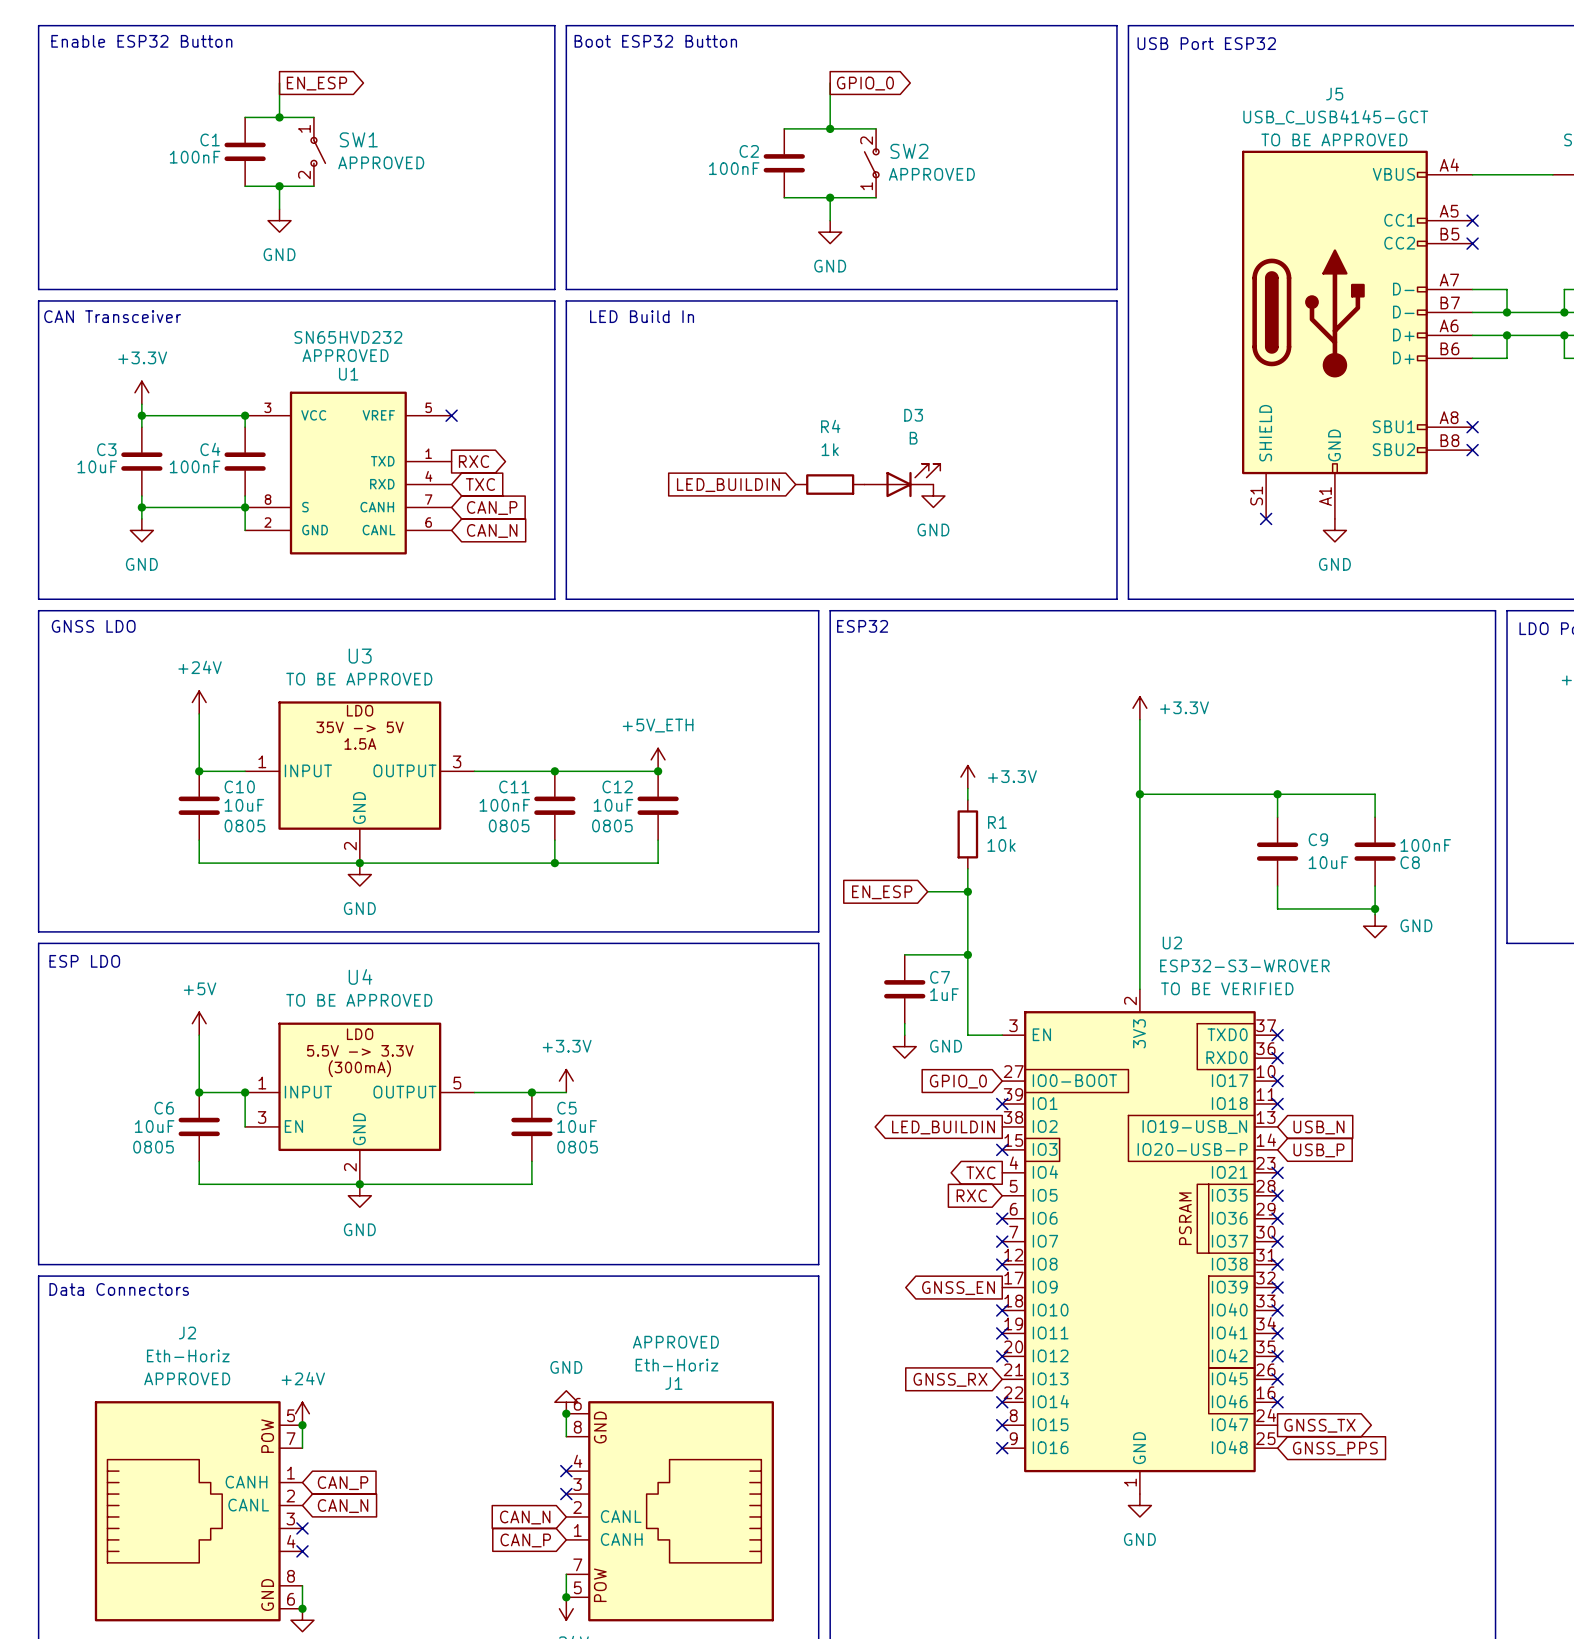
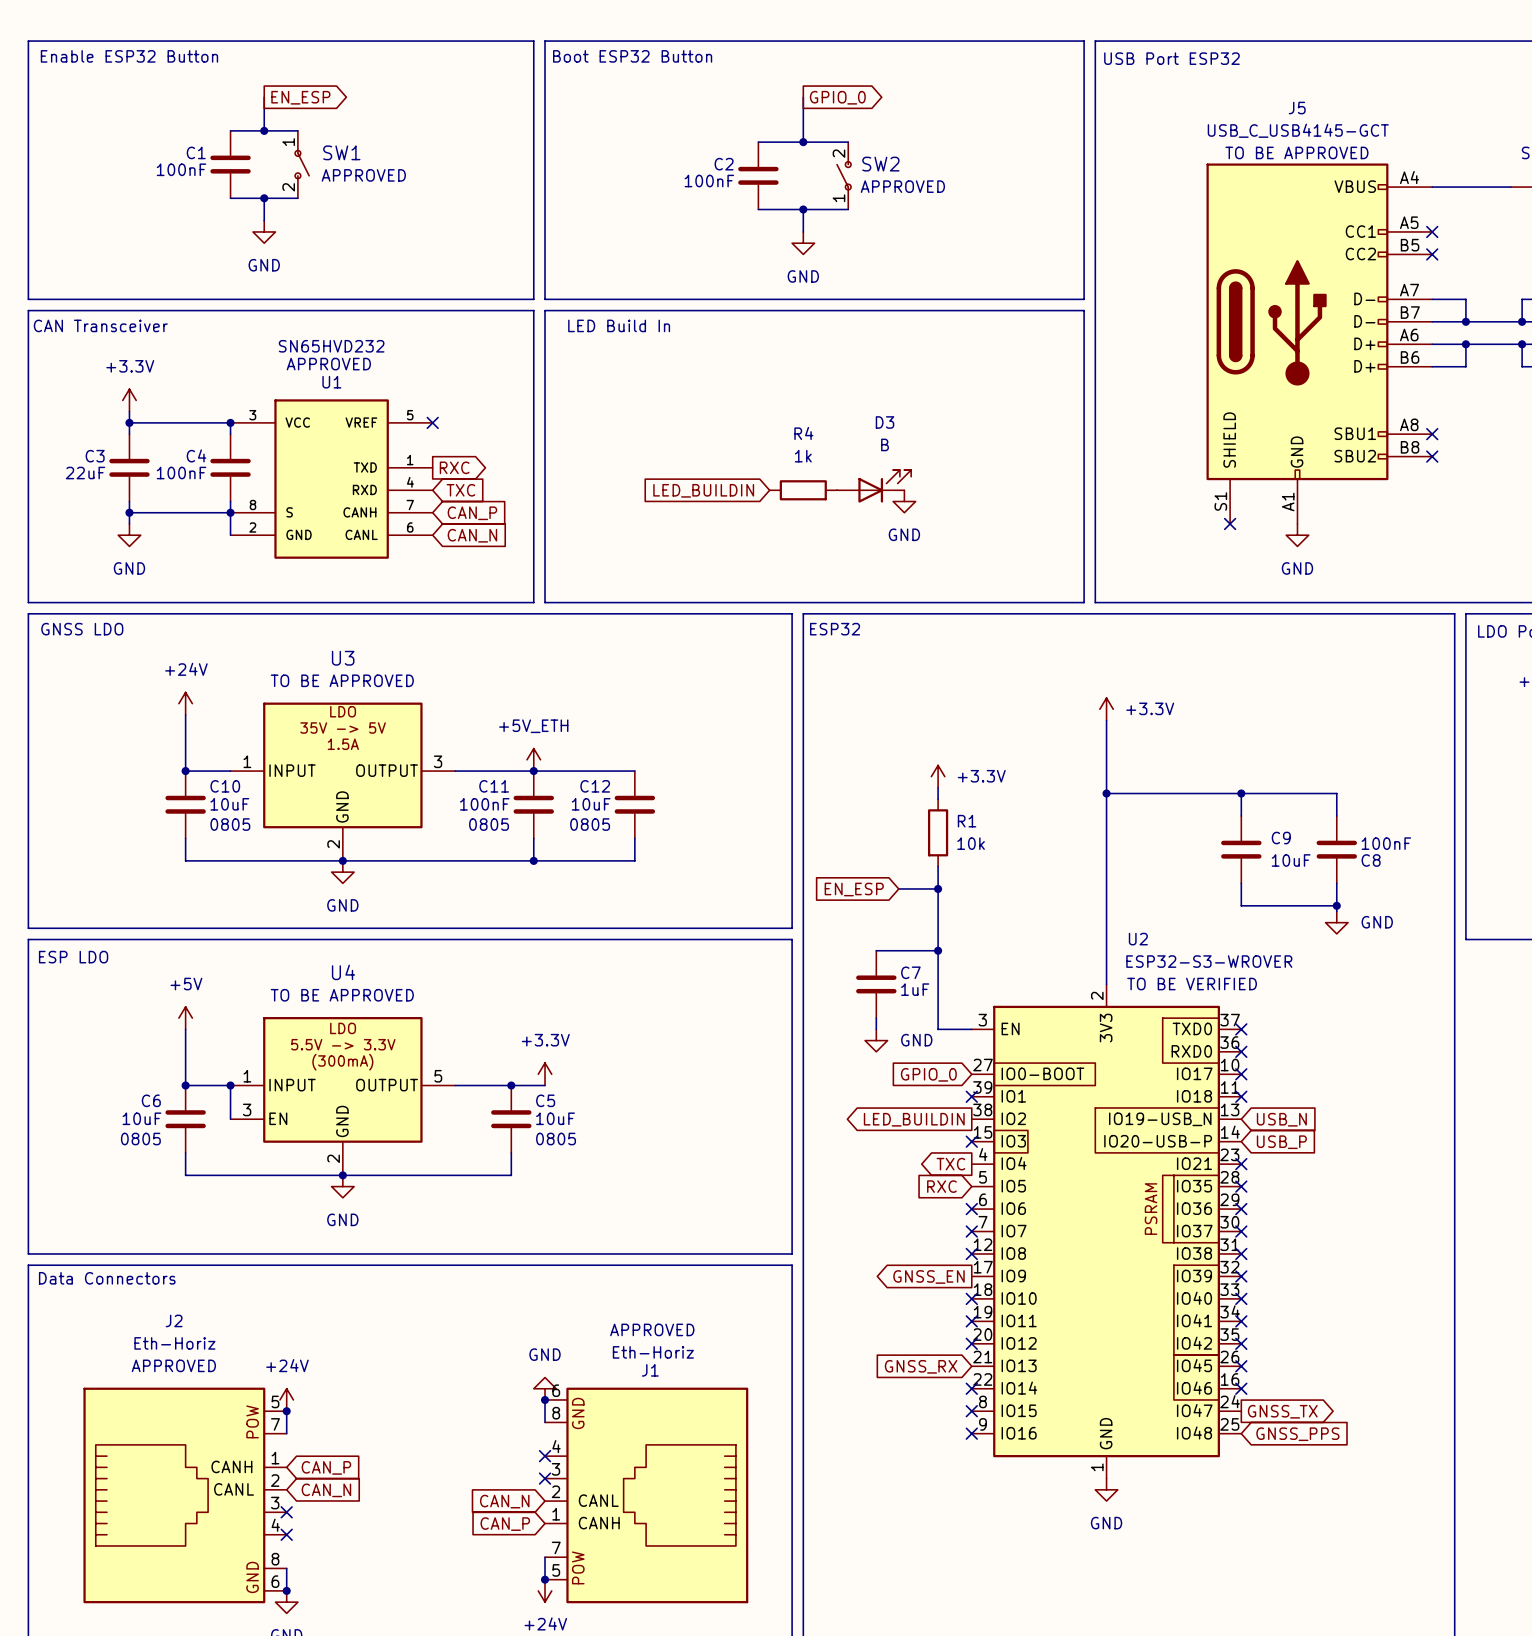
C3 value: 10uF (97, 466) -> 22uF (85, 473)
power symbol position: +5V_ETH (658, 759) -> +5V_ETH (533, 759)
junction: (658, 771) -> none

